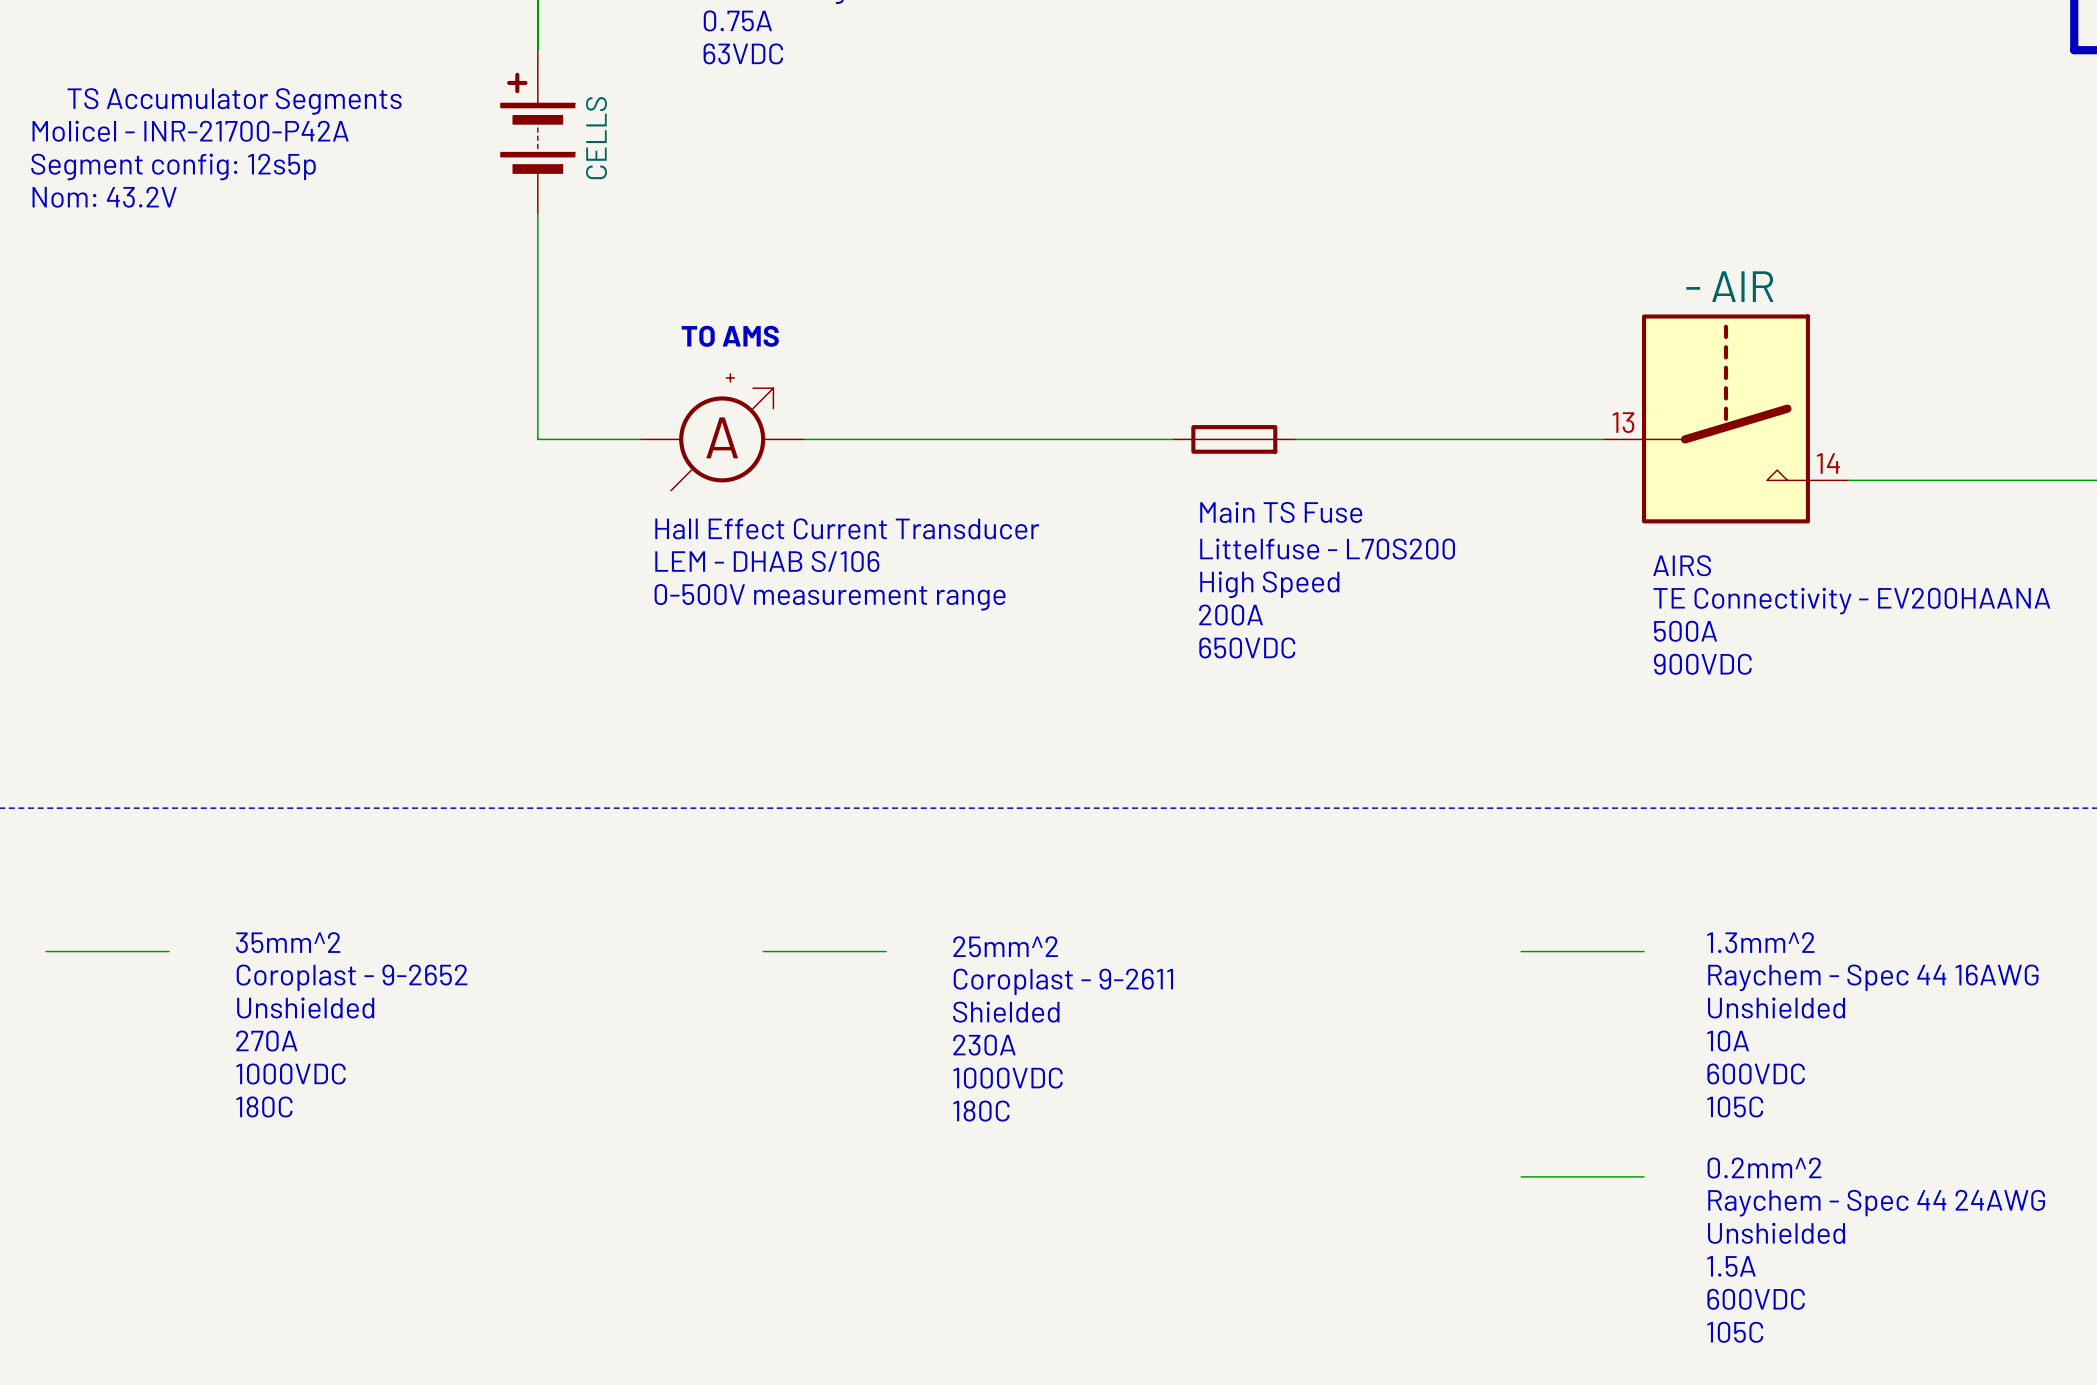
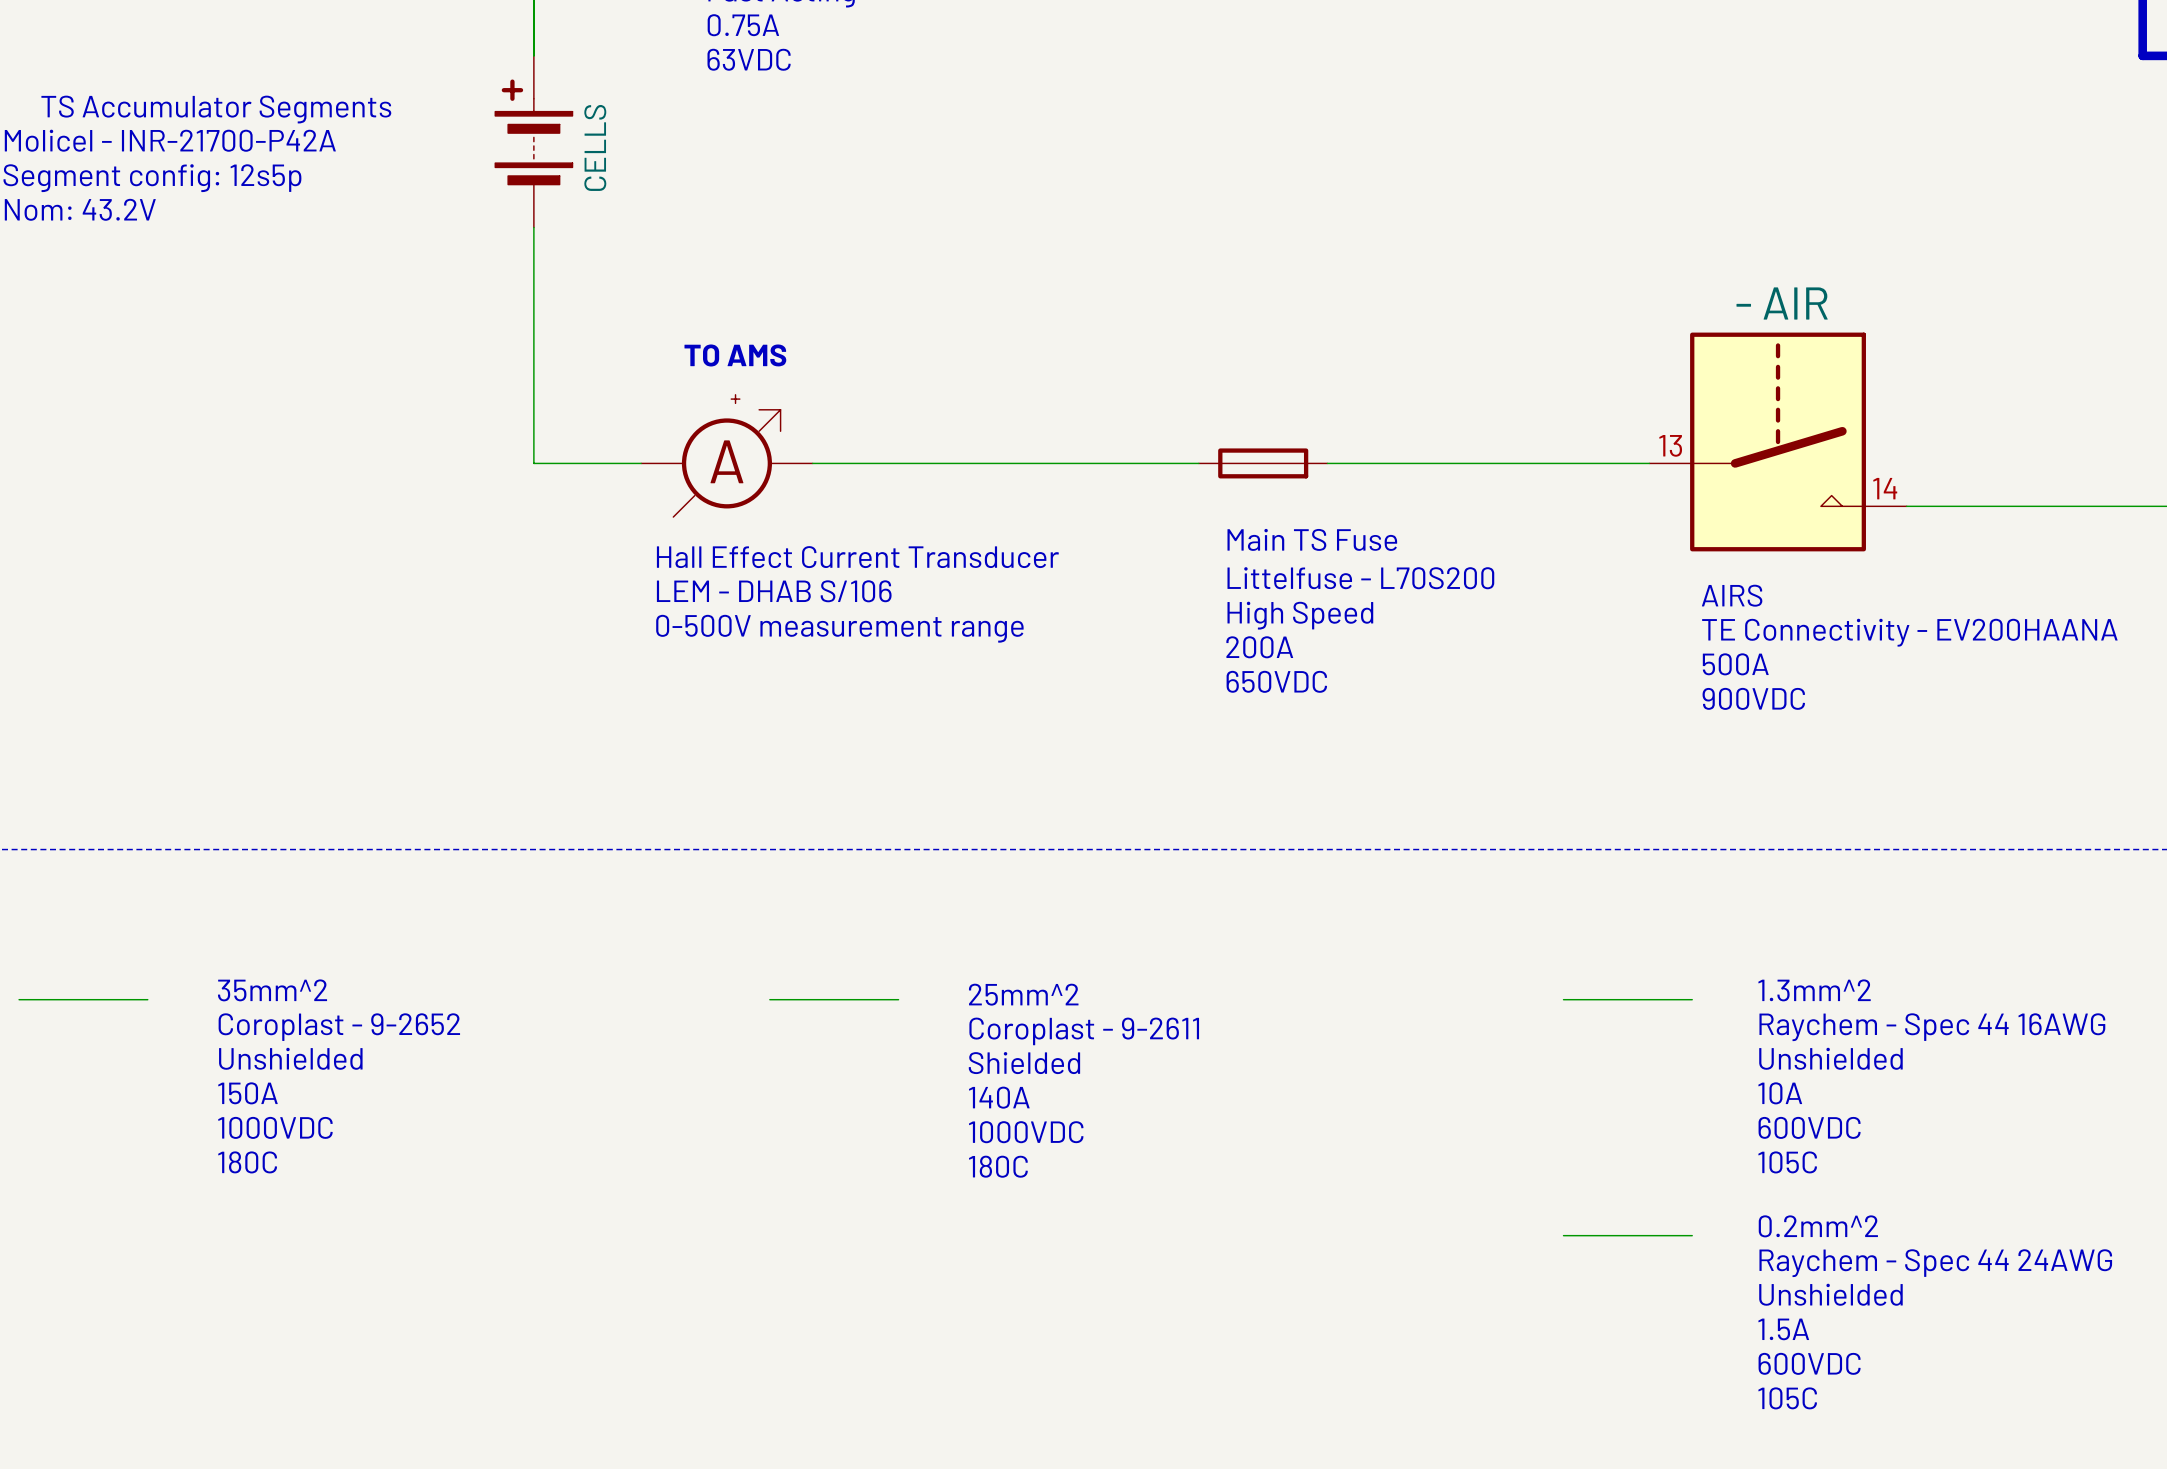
text: 270A (266, 1041) -> 150A (247, 1093)
text: 230A (984, 1045) -> 140A (999, 1097)

